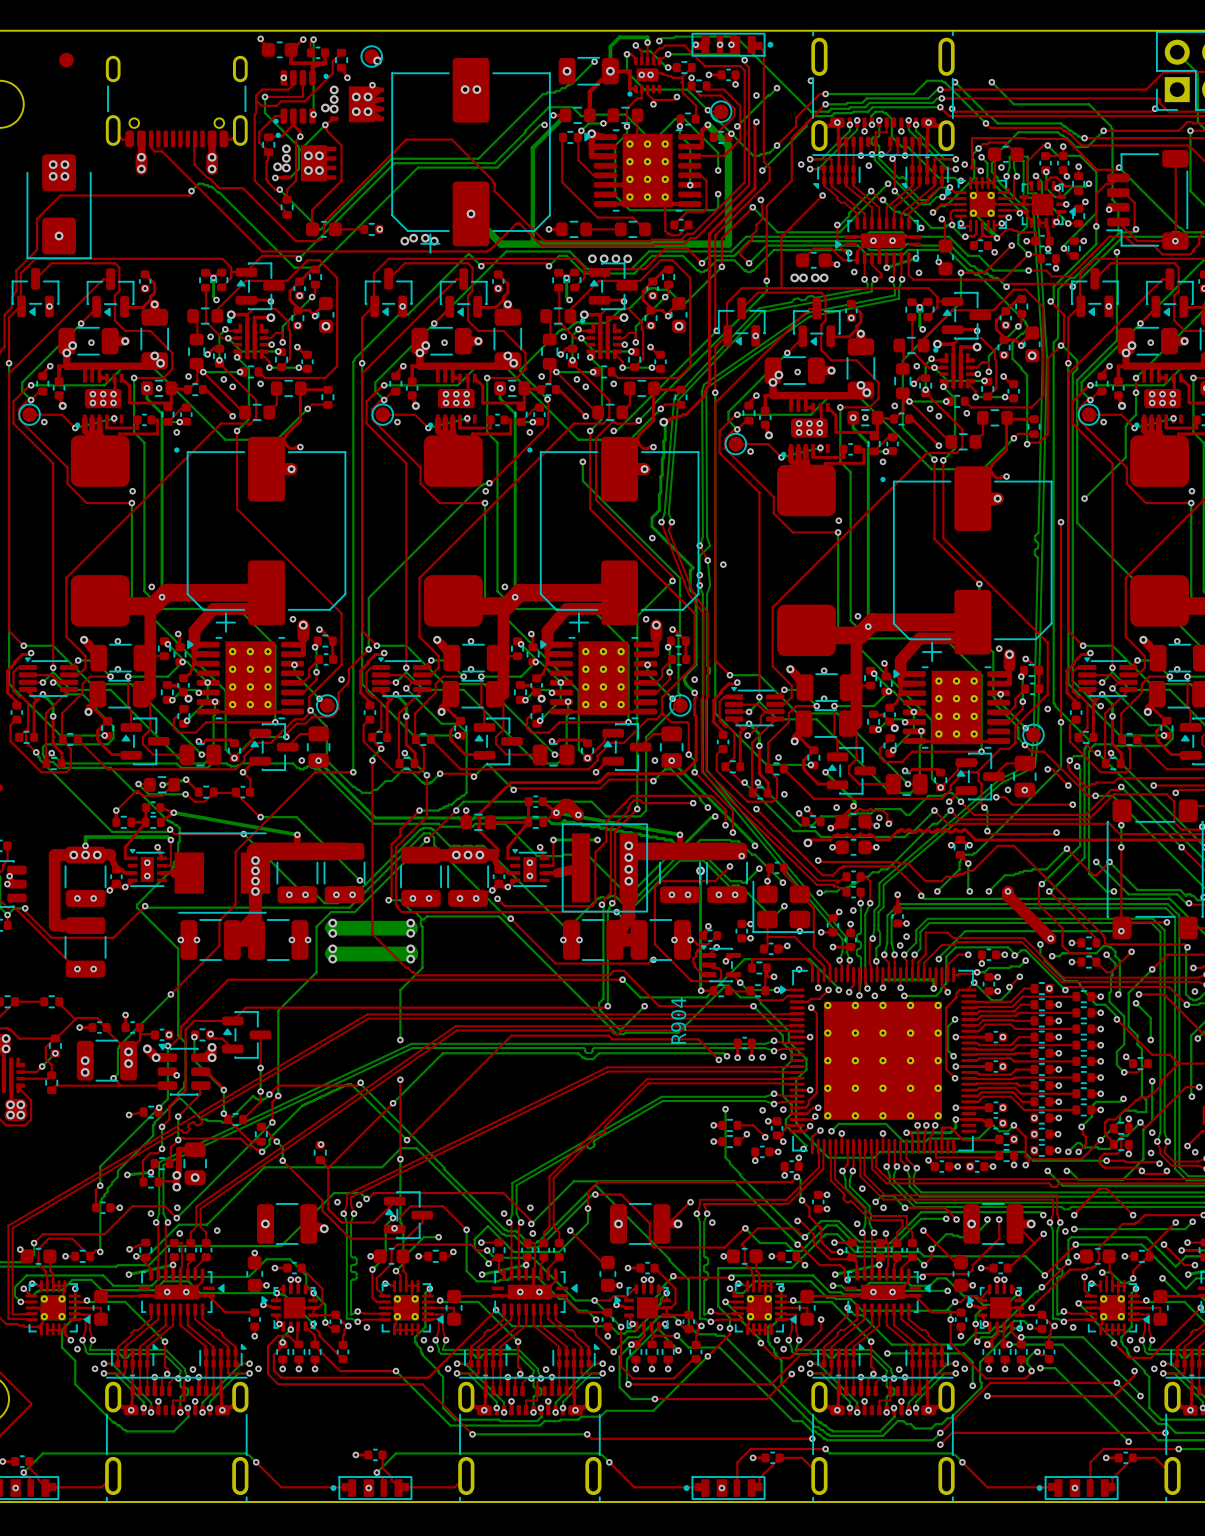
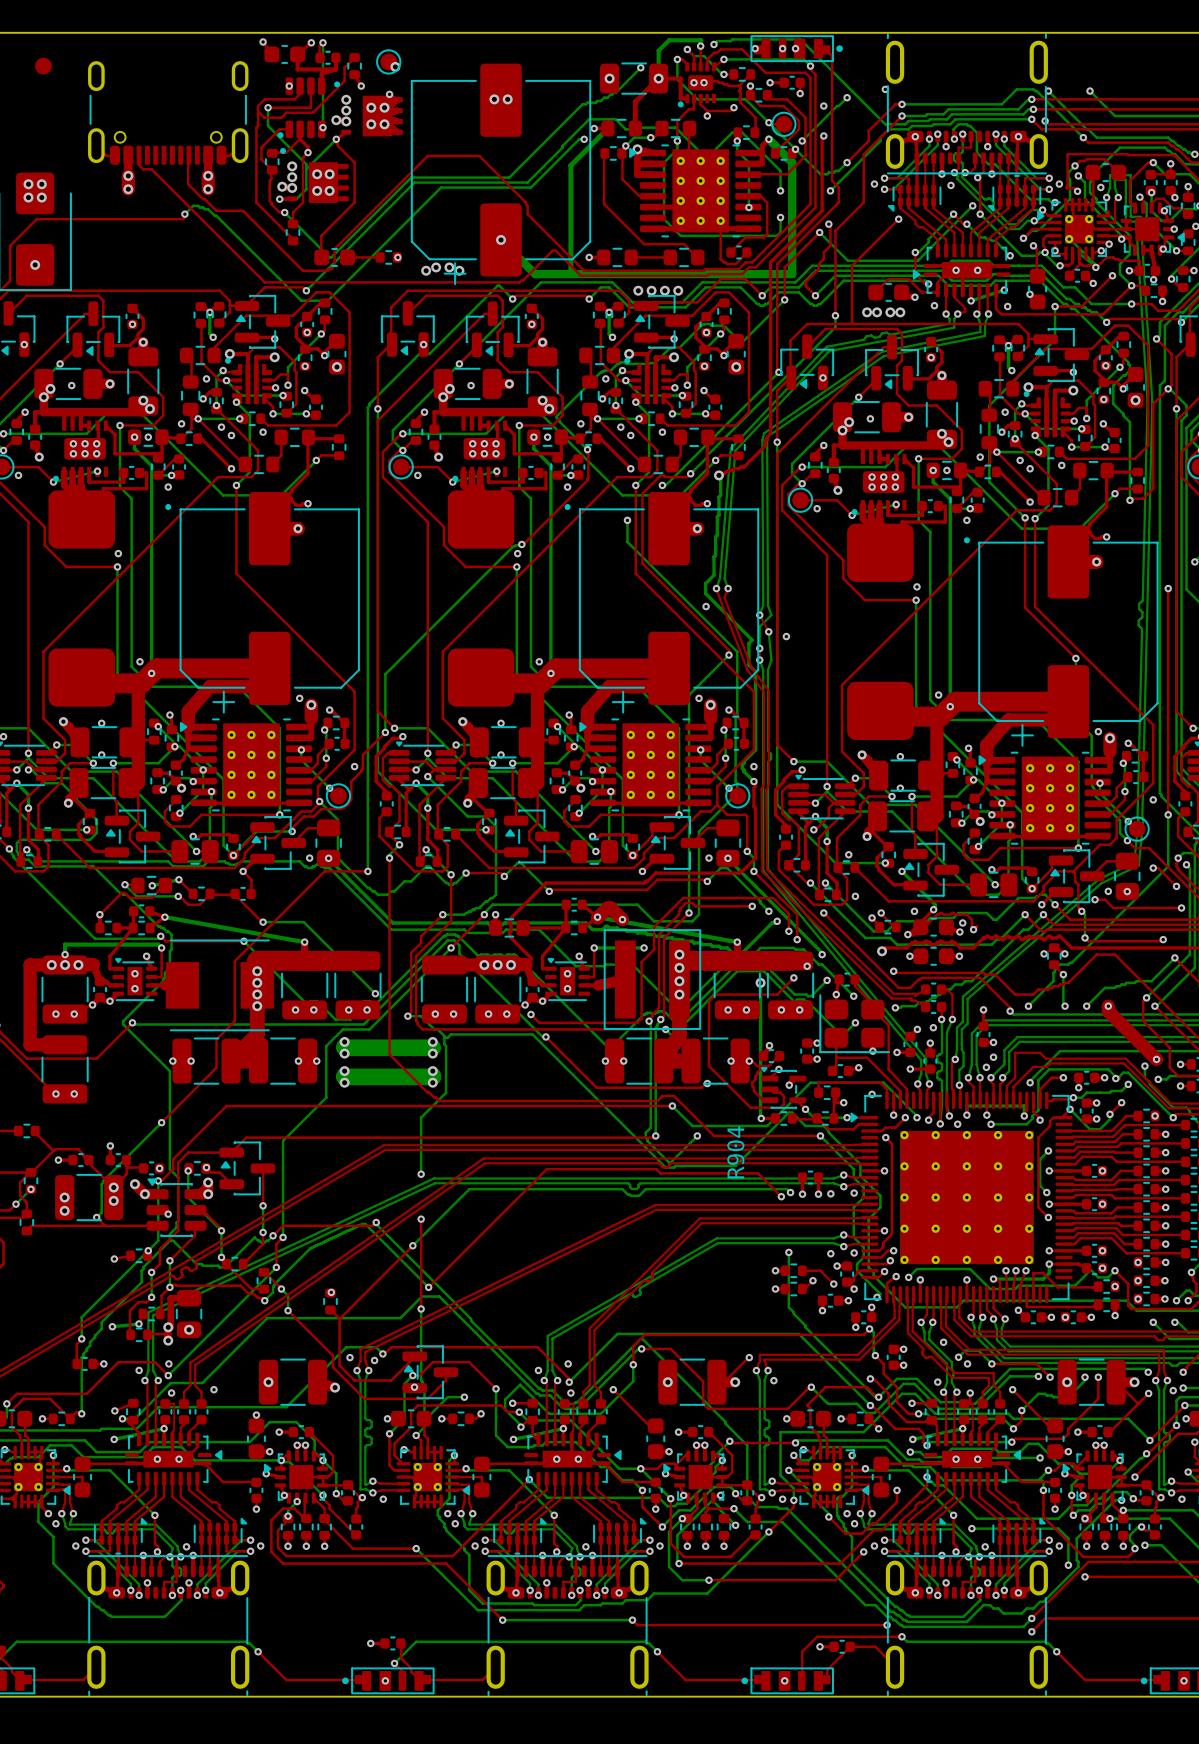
top track: (1028, 1159) (1025, 1165) -> none
via: (1025, 1165) -> none

